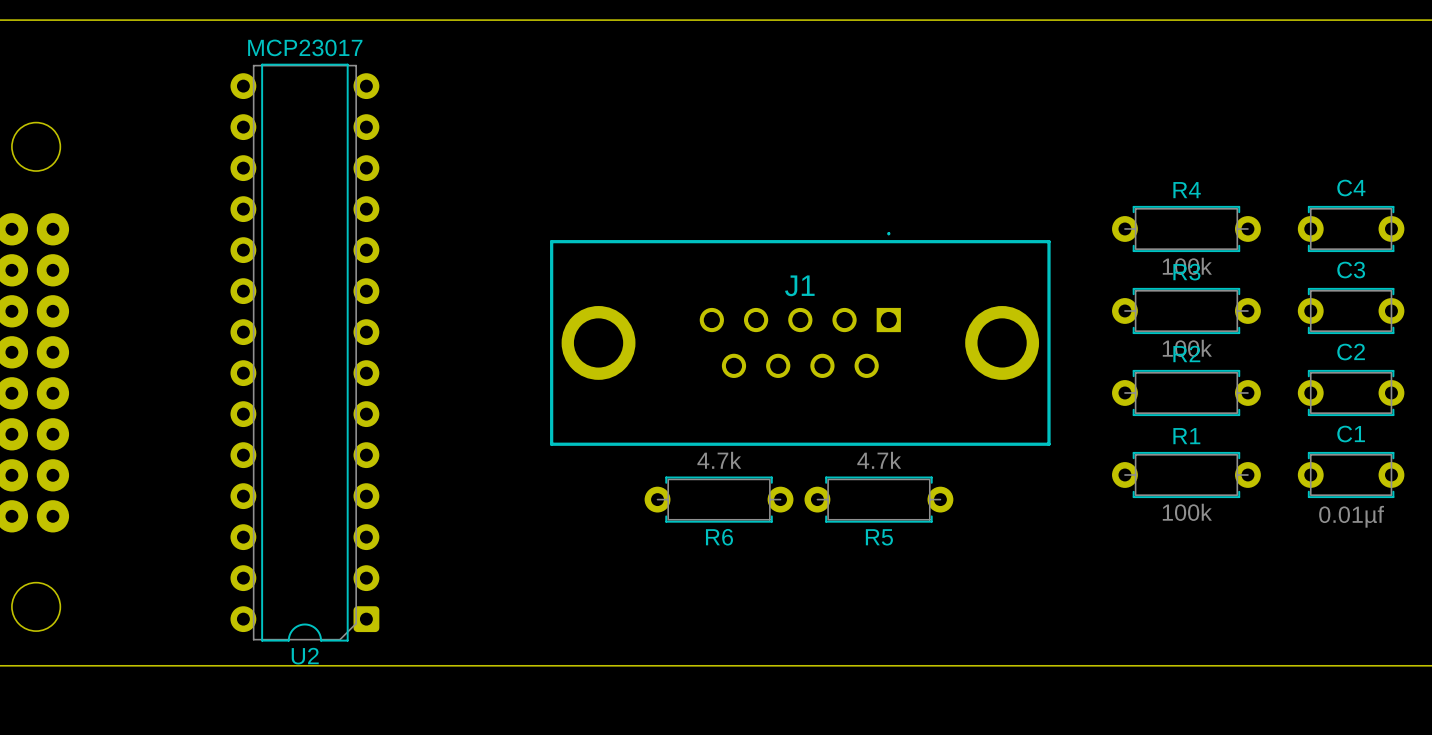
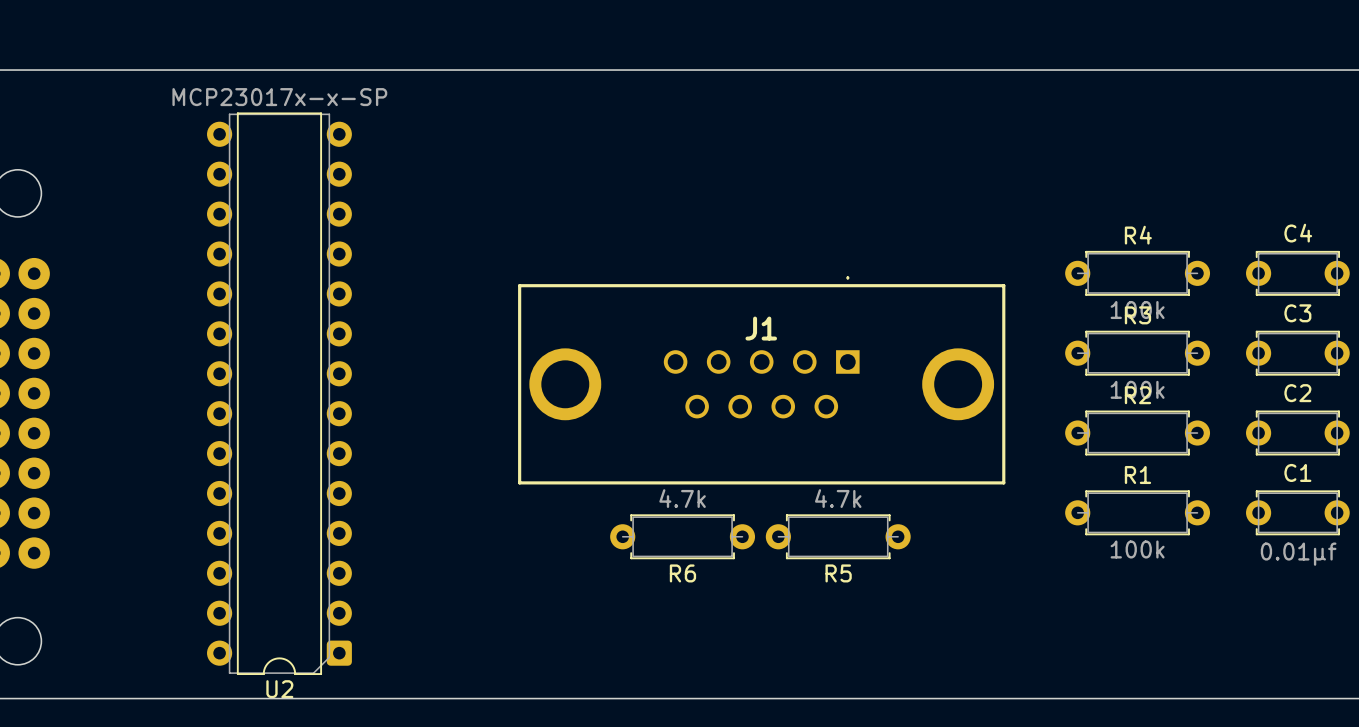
U2 value: MCP23017 (305, 47) -> MCP23017x-x-SP (279, 97)

